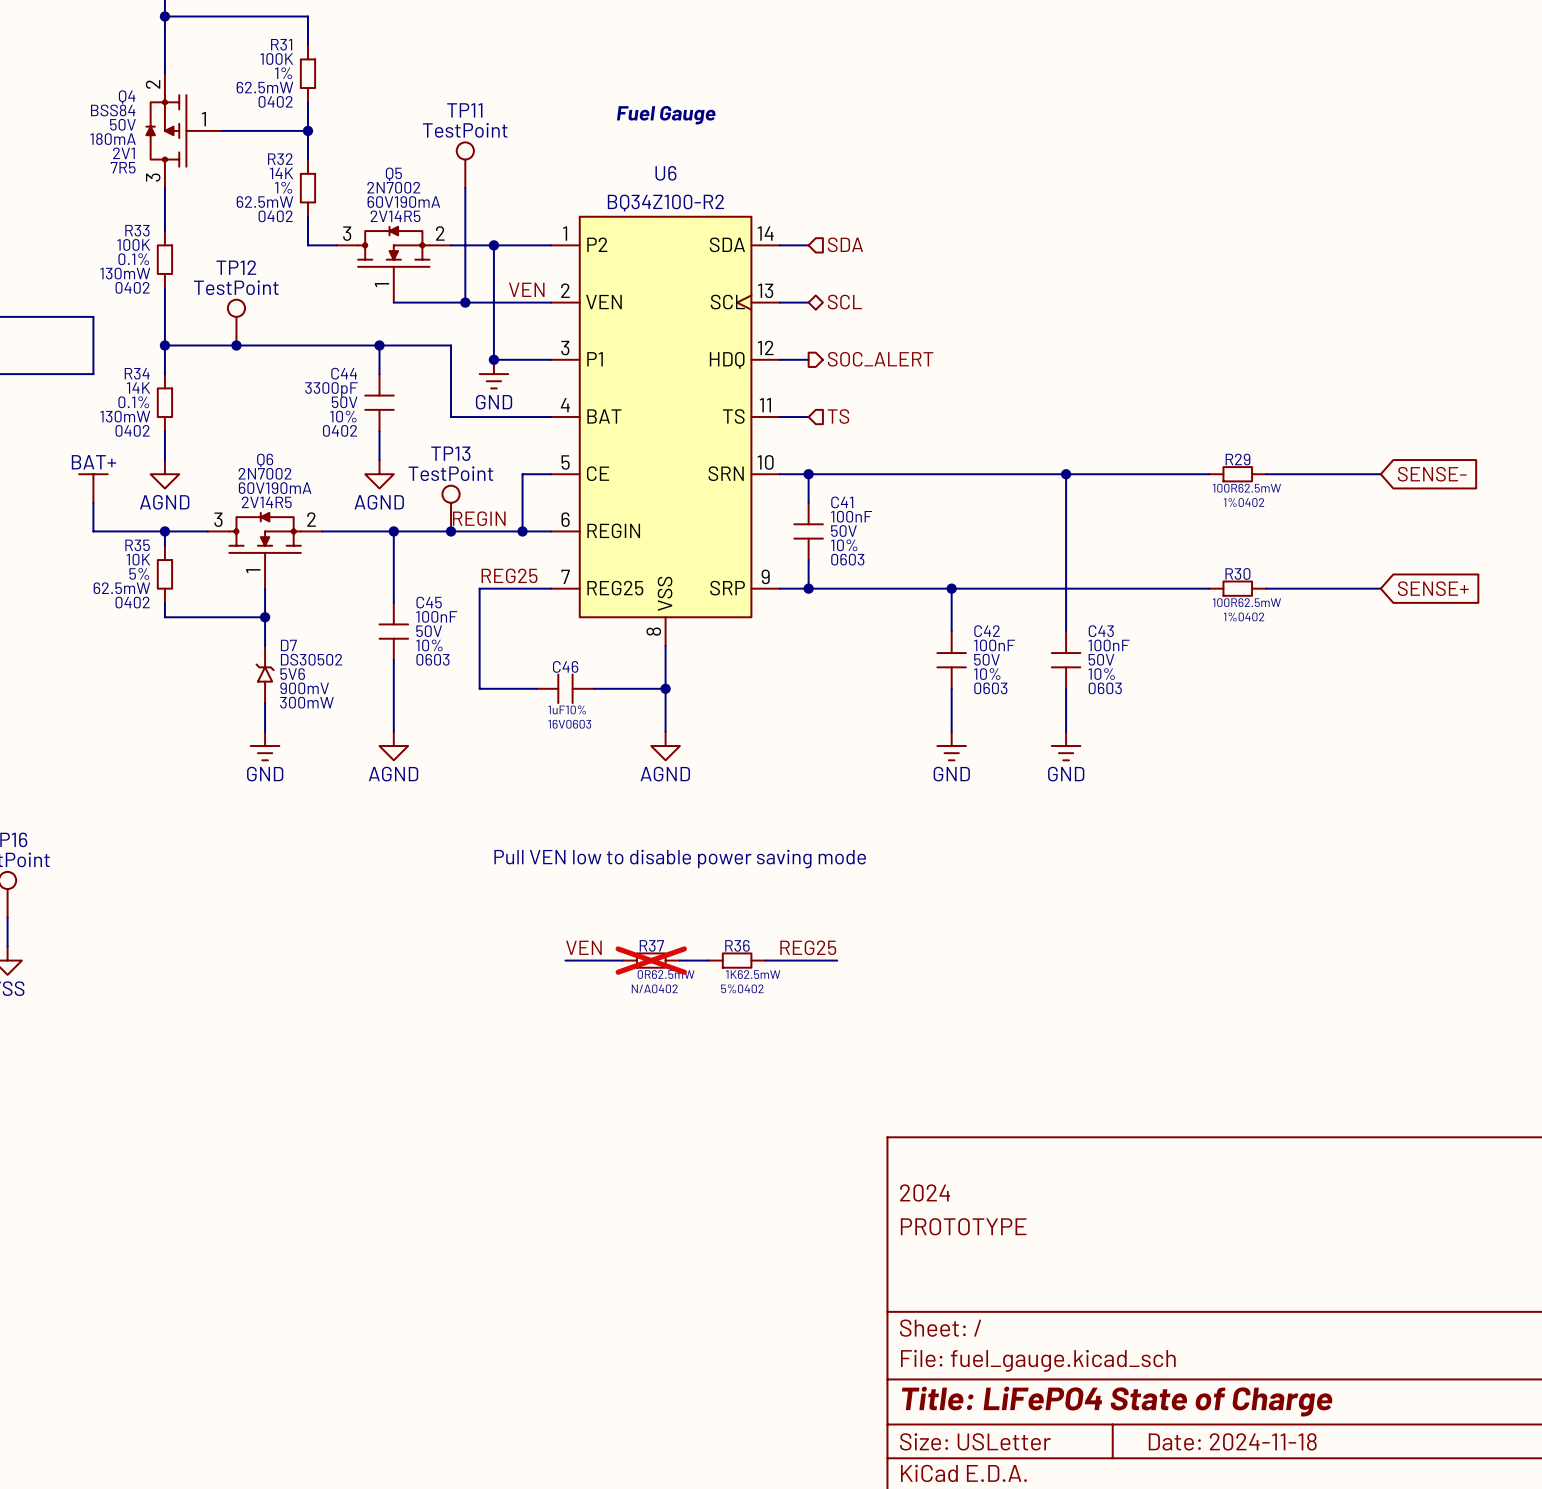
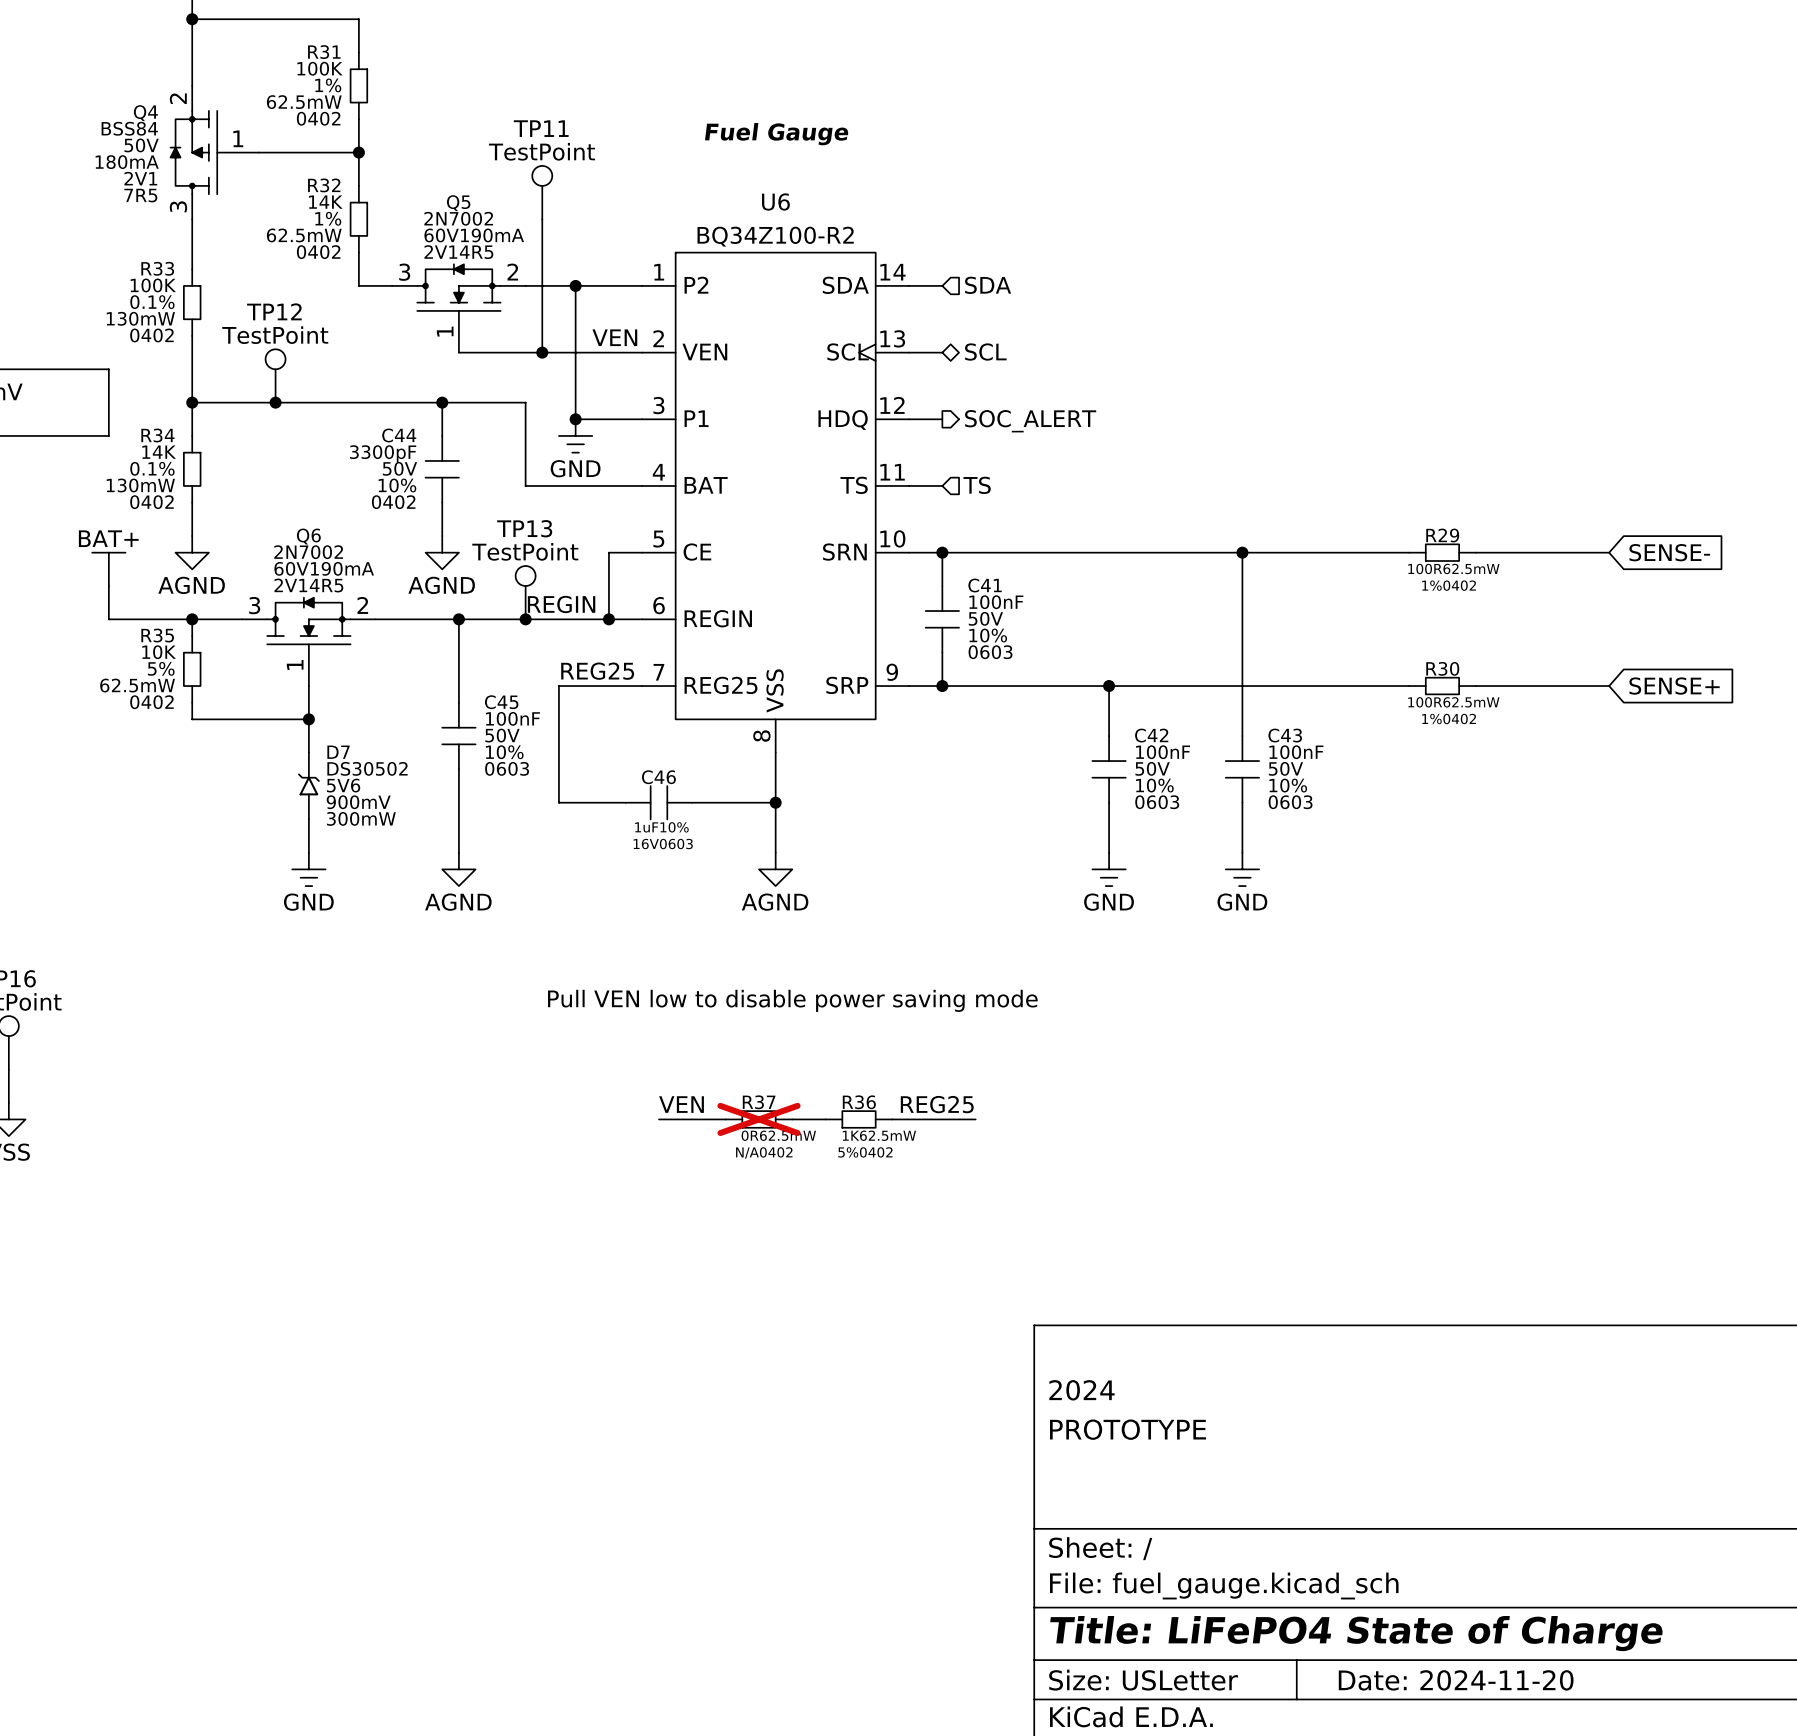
title block: Date: 2024-11-18 (1232, 1441) -> Date: 2024-11-20 (1456, 1680)

